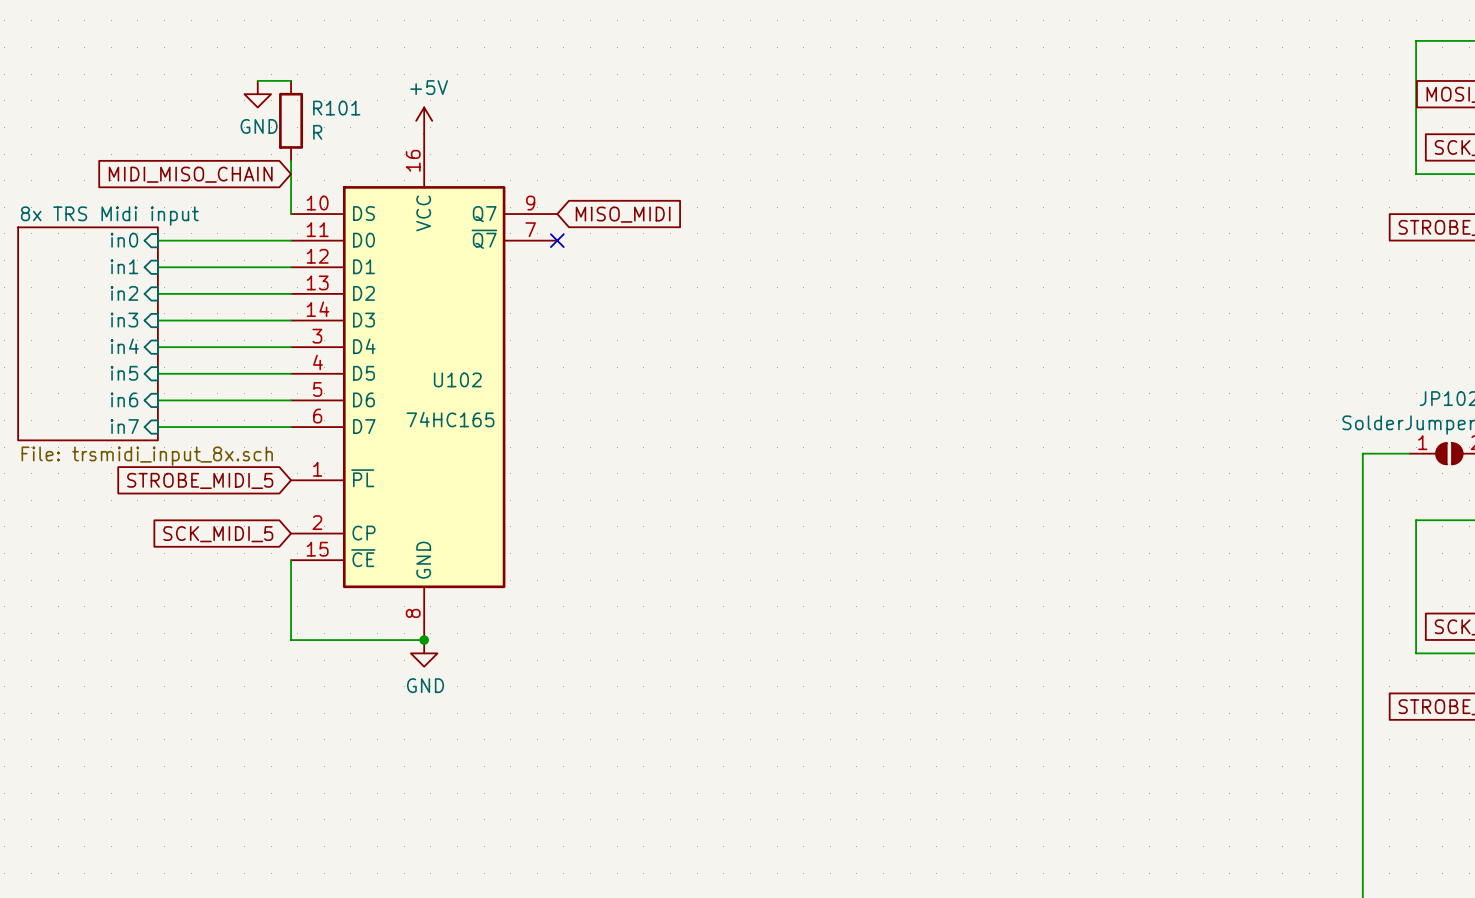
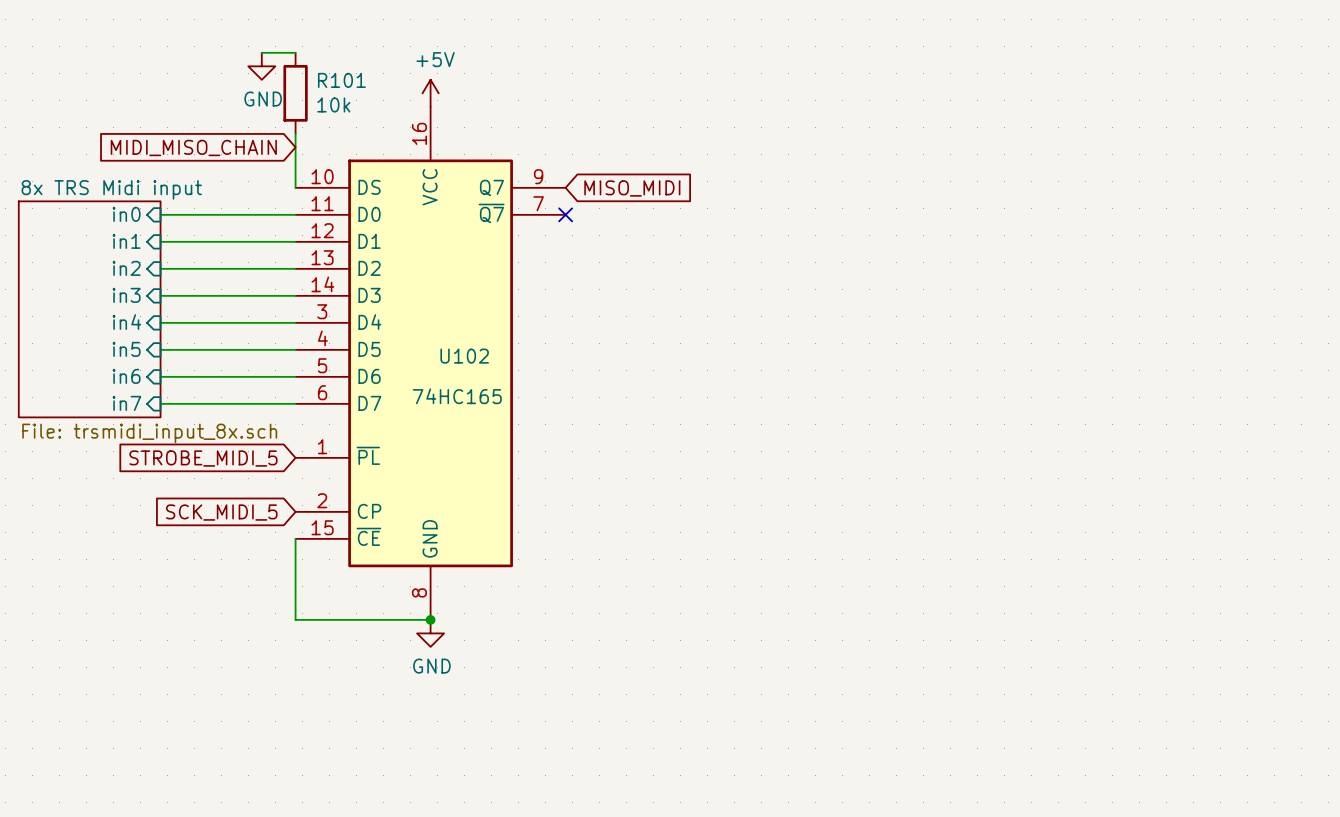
R101 value: R (317, 132) -> 10k (333, 104)

